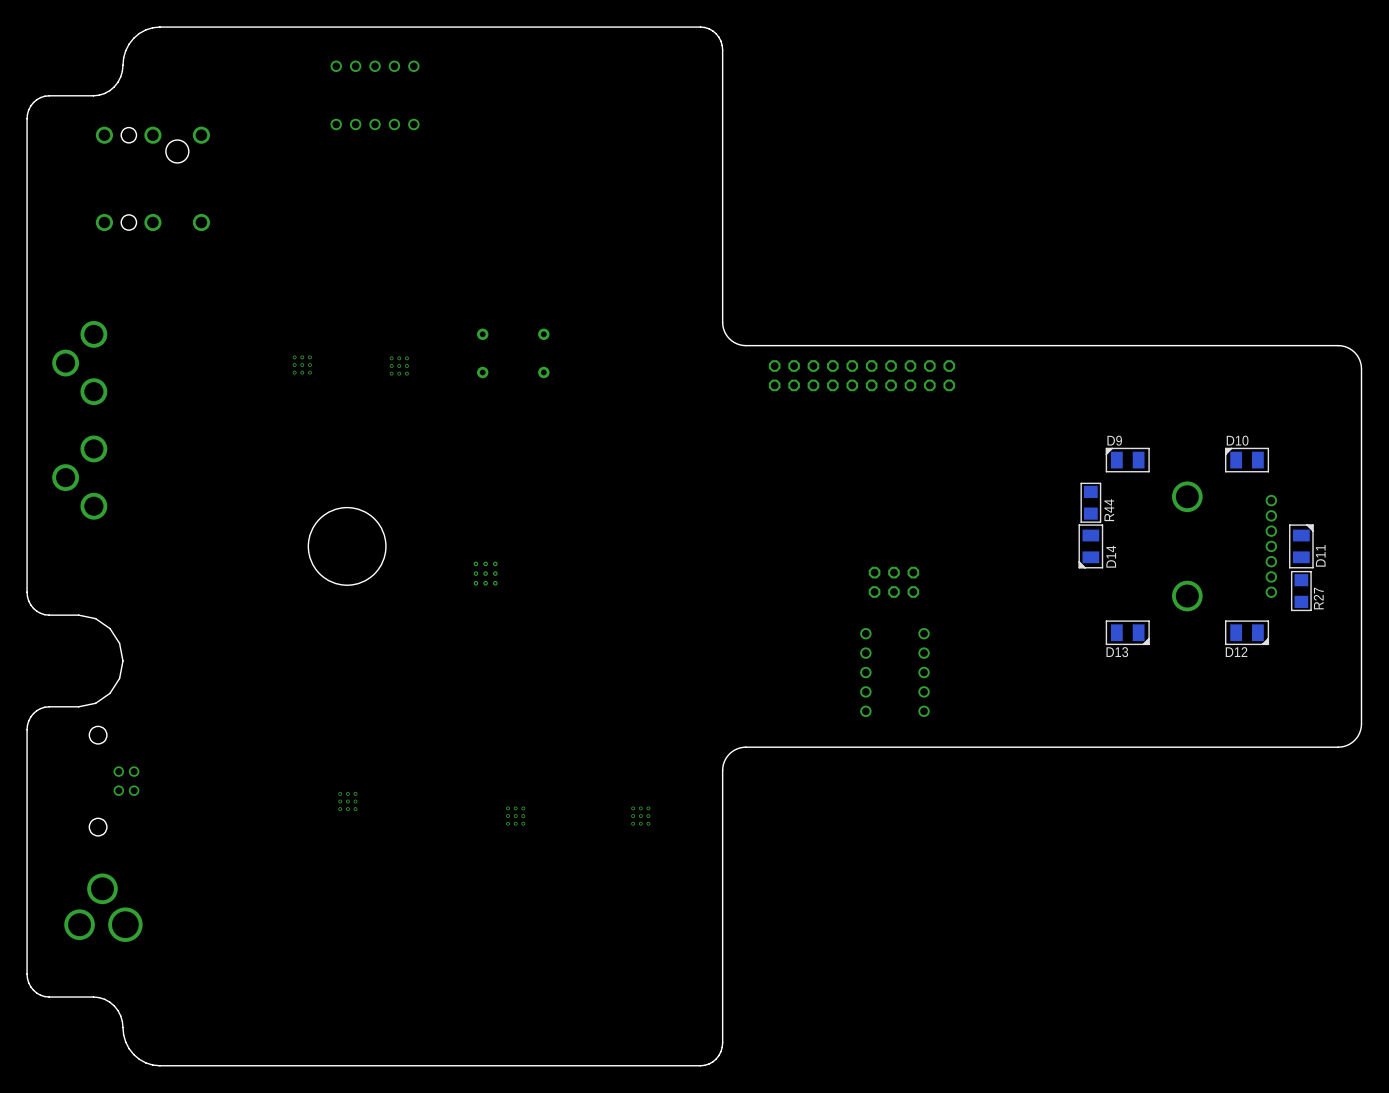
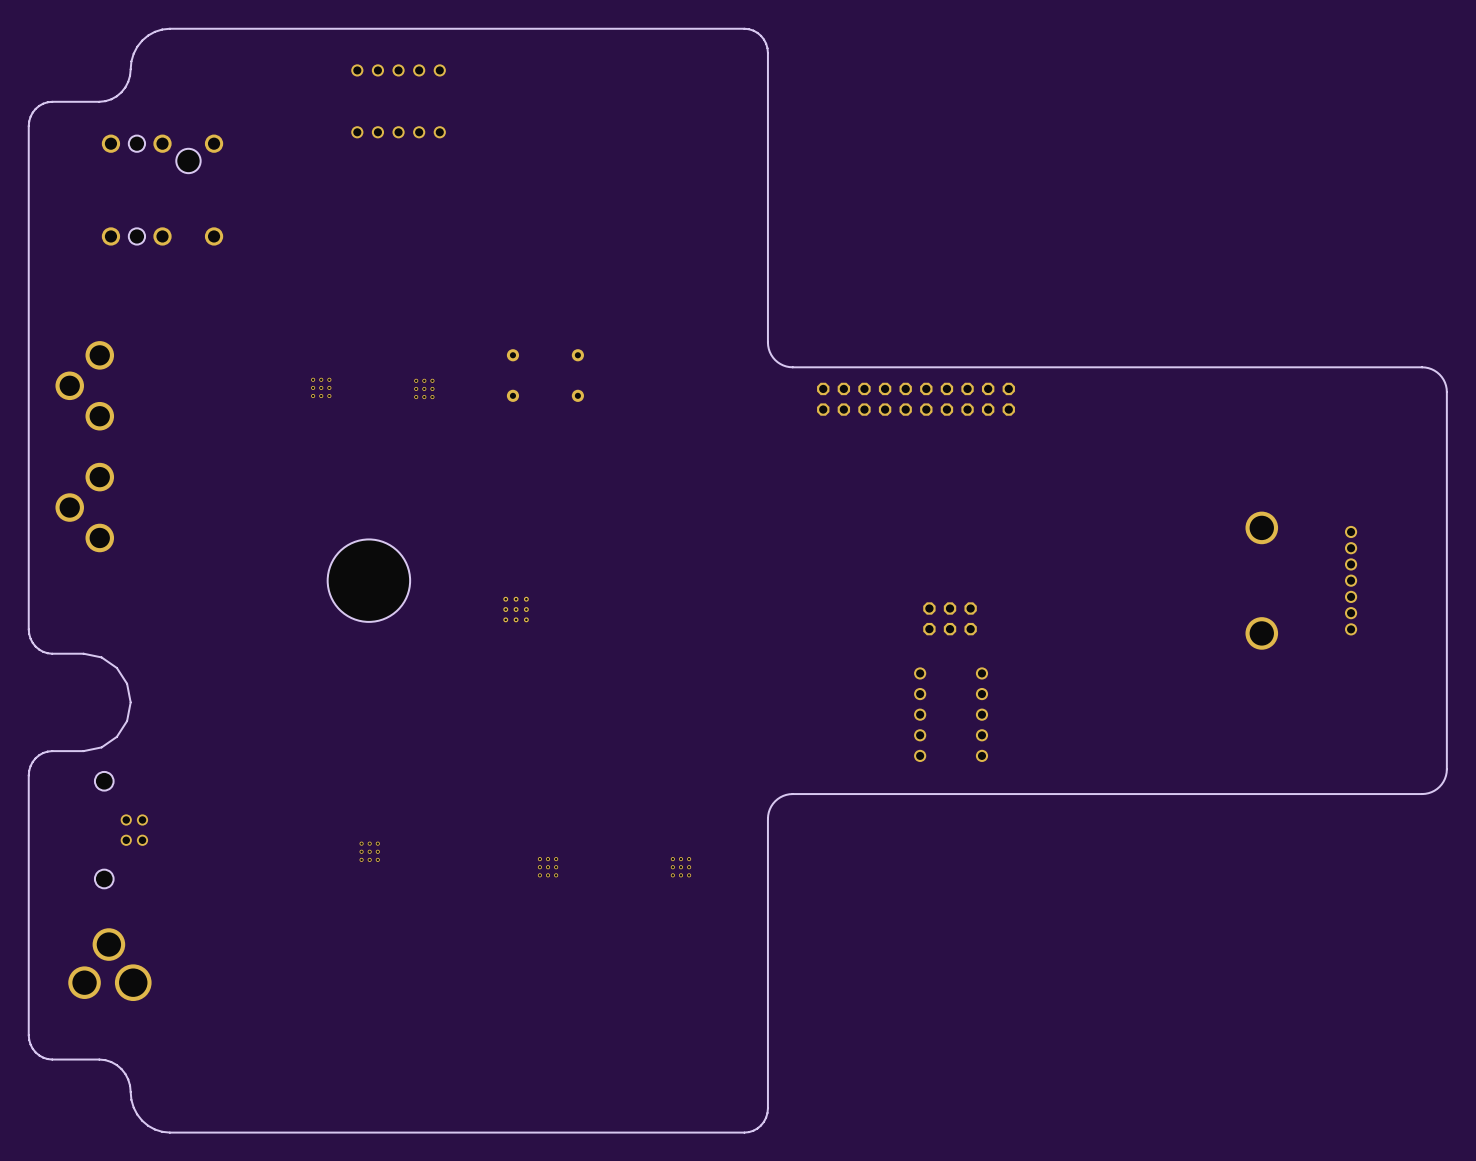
D9: (1127, 460) -> none
D10: (1247, 460) -> none
R44: (1090, 502) -> none
D14: (1090, 546) -> none
D11: (1301, 546) -> none
R27: (1301, 591) -> none
D13: (1127, 632) -> none
D12: (1247, 632) -> none

